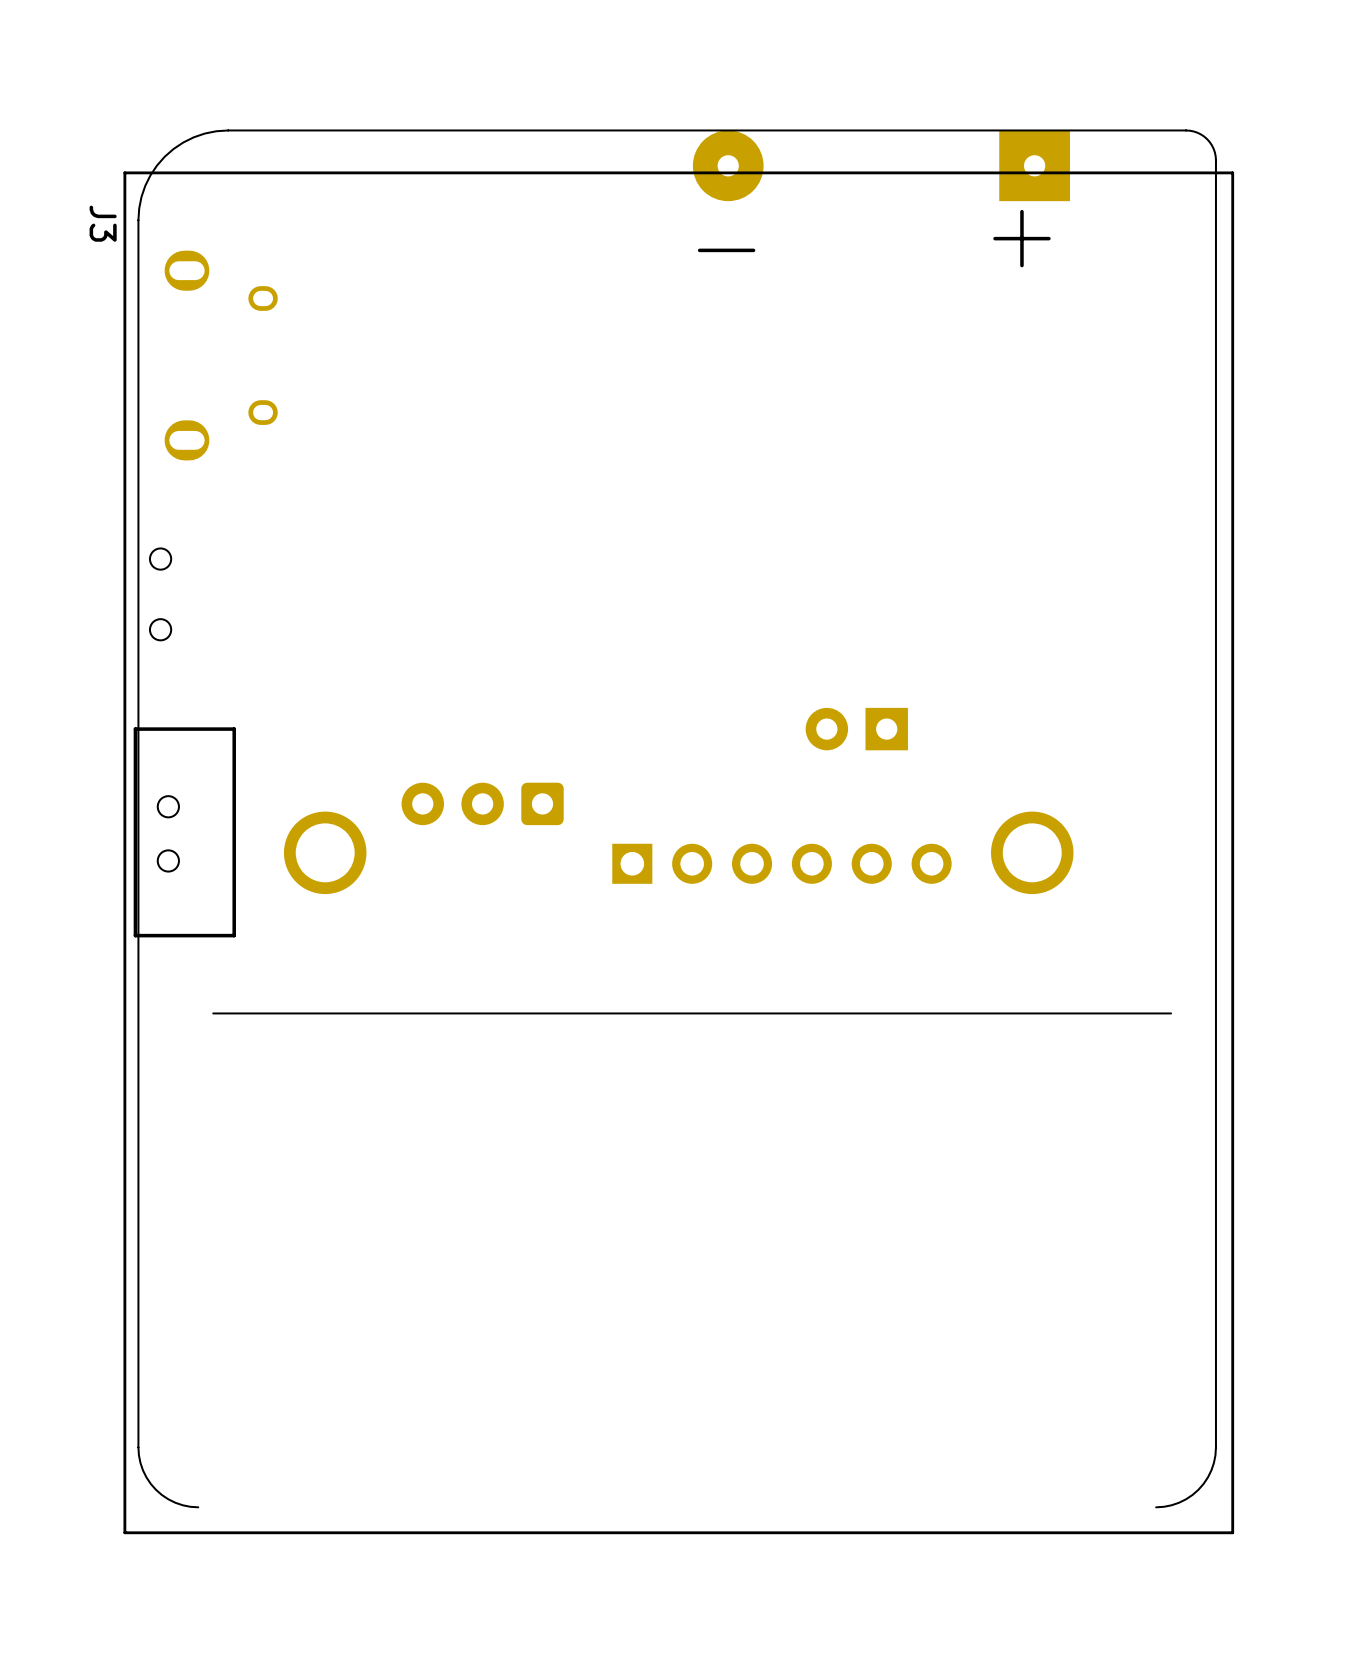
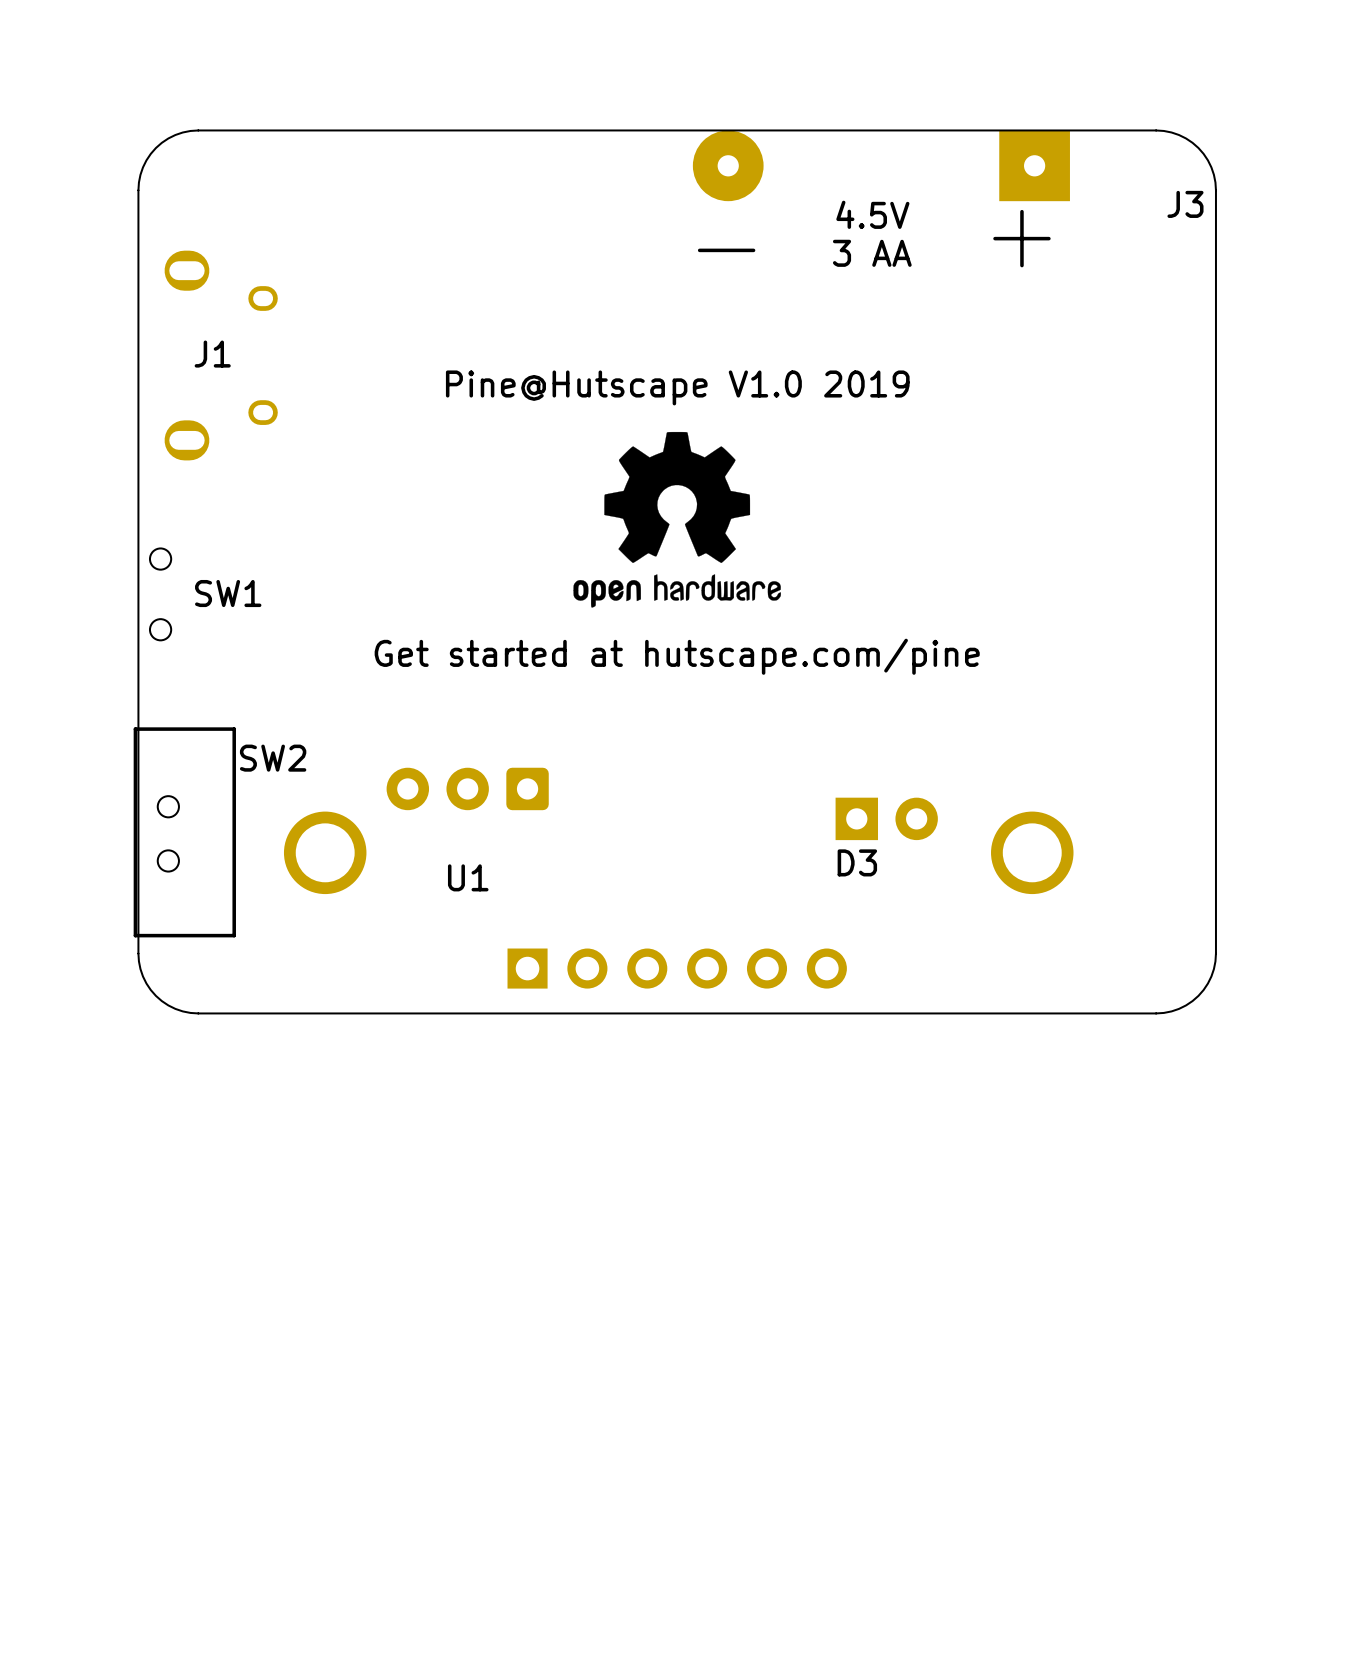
J3 footprint: [123, 130, 1235, 1535] -> [283, 130, 1074, 895]
board edge: (228, 130) (204, 133) (193, 137) (173, 149) (164, 156) (150, 175) (145, 185) (139, 208) (138, 220) -> (228, 130) (182, 132) (168, 138) (155, 147) (146, 160) (140, 174) (138, 220)
board edge: (1156, 130) (1189, 130) (1201, 134) (1211, 145) (1215, 160) -> (1156, 130) (1179, 135) (1198, 147) (1211, 167) (1215, 190)
board edge: (1215, 160) (1215, 190) -> none
text: none -> 4.5V (872, 214)
J3 name position: J3 (103, 223) -> J3 (1185, 204)
text: none -> 3 AA (872, 253)
text: none -> J1 (212, 354)
text: none -> Pine@Hutscape V1.0 2019 (677, 387)
drawing: none -> [573, 431, 781, 608]
text: none -> SW1 (228, 593)
text: none -> Get started at hutscape.com/pine (677, 656)
part rotation: 0° (856, 729) -> 180° (886, 818)
part position: (856, 729) -> (886, 818)
text: none -> SW2 (273, 758)
part position: (482, 803) -> (467, 788)
text: none -> D3 (857, 862)
part position: (781, 863) -> (677, 968)
text: none -> U1 (468, 877)
board edge: (138, 953) (138, 1455) (142, 1470) (155, 1489) (175, 1502) (198, 1507) -> (138, 953) (142, 976) (150, 990) (161, 1001) (182, 1011) (213, 1013)
board edge: (1215, 953) (1215, 1455) (1207, 1477) (1198, 1489) (1179, 1502) (1156, 1507) -> none
board edge: (1171, 1013) (1156, 1013) -> (1215, 953) (1211, 976) (1198, 995) (1179, 1008) (1156, 1013)

